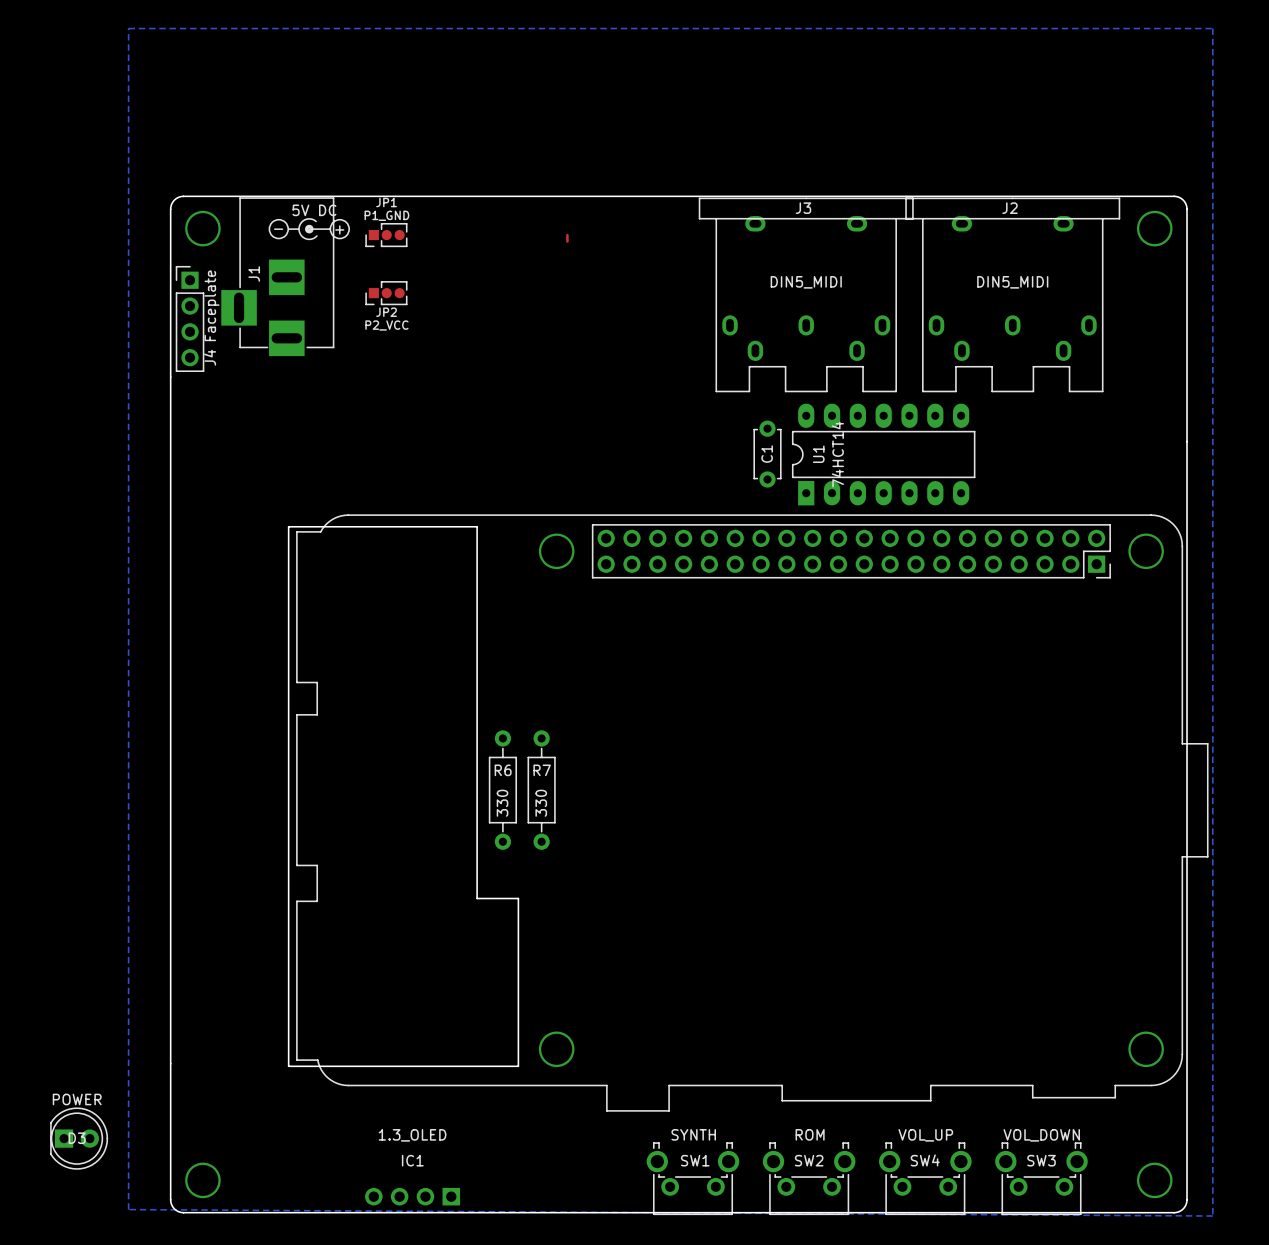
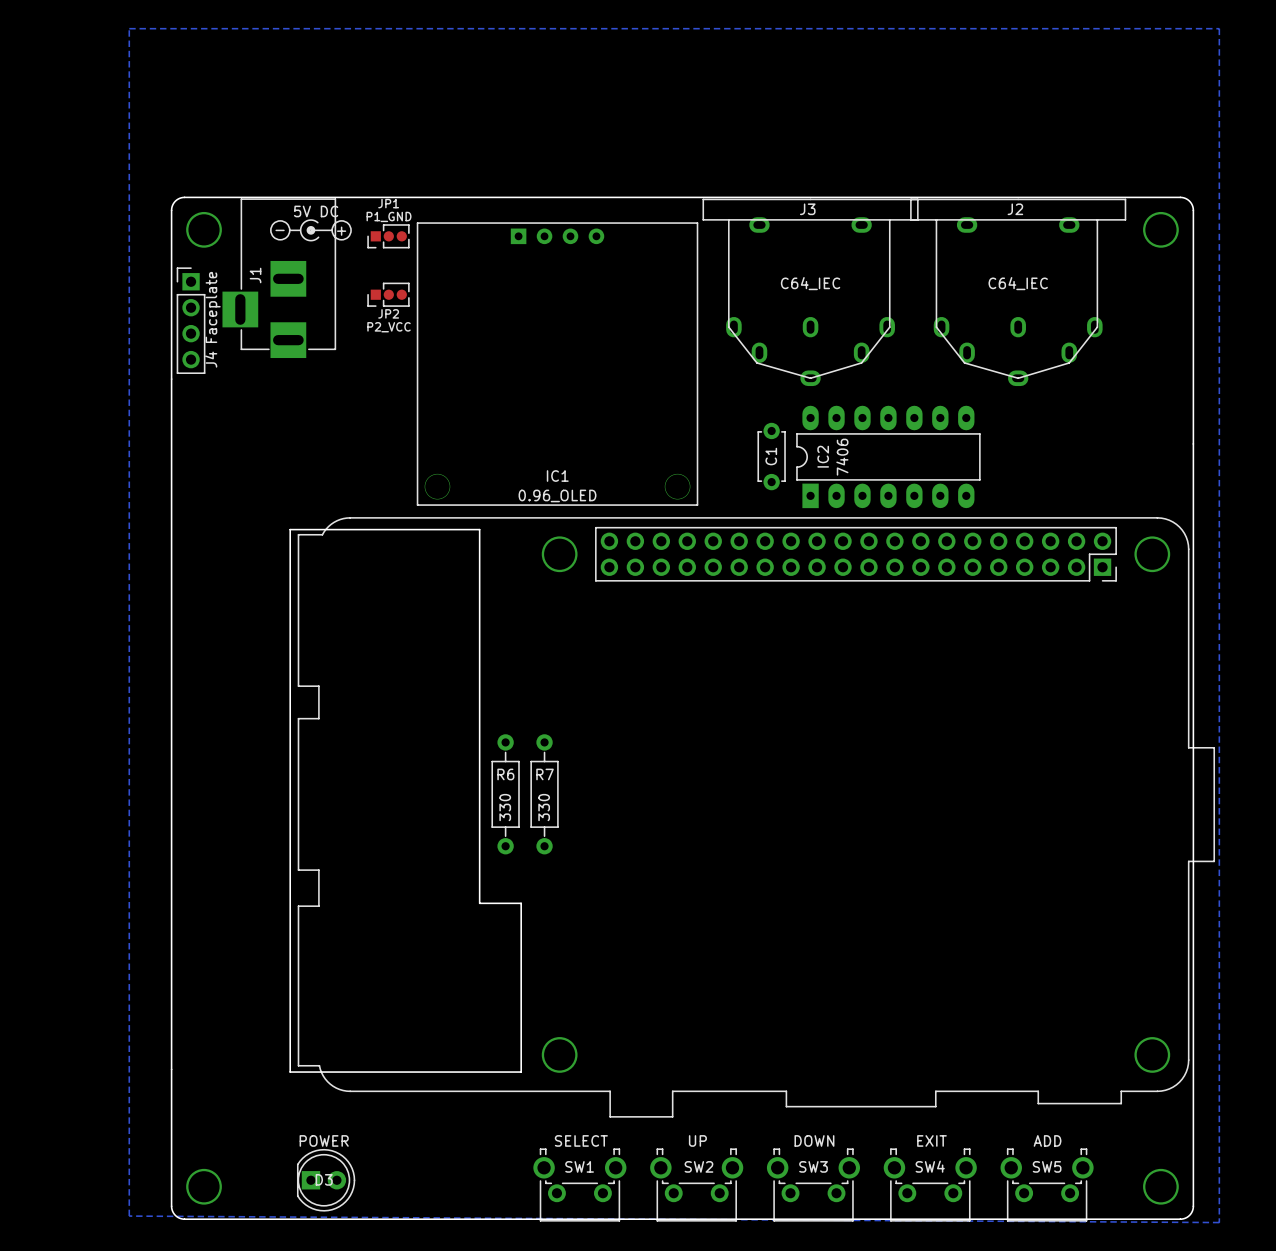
J3 footprint: [698, 197, 914, 393] -> [702, 198, 919, 387]
J2 footprint: [905, 197, 1121, 393] -> [910, 198, 1127, 387]
J3 value: DIN5_MIDI (806, 282) -> C64_IEC (810, 283)
J2 value: DIN5_MIDI (1012, 282) -> C64_IEC (1018, 283)
U1 name: U1 (818, 454) -> IC2 (823, 456)
U1 value: 74HCT14 (837, 454) -> 7406 (842, 457)
SW1 value: SYNTH (693, 1134) -> UP (697, 1140)
SW2 value: ROM (810, 1134) -> DOWN (814, 1140)
IC1 value: 1.3_OLED (412, 1135) -> 0.96_OLED (557, 495)
SW4 value: VOL_UP (925, 1135) -> EXIT (931, 1140)
SW3 value: VOL_DOWN (1041, 1135) -> ADD (1047, 1140)
D3 position: (79, 1138) -> (326, 1180)
IC1 name position: IC1 (412, 1160) -> IC1 (557, 476)
SW1 name: SW1 (695, 1160) -> SW2 (698, 1166)
SW2 name: SW2 (809, 1160) -> SW3 (813, 1166)
SW3 name: SW3 (1041, 1160) -> SW5 (1047, 1166)
SW1: none -> SELECT (579, 1185)
IC1 footprint: [365, 1187, 461, 1206] -> [416, 222, 699, 506]

